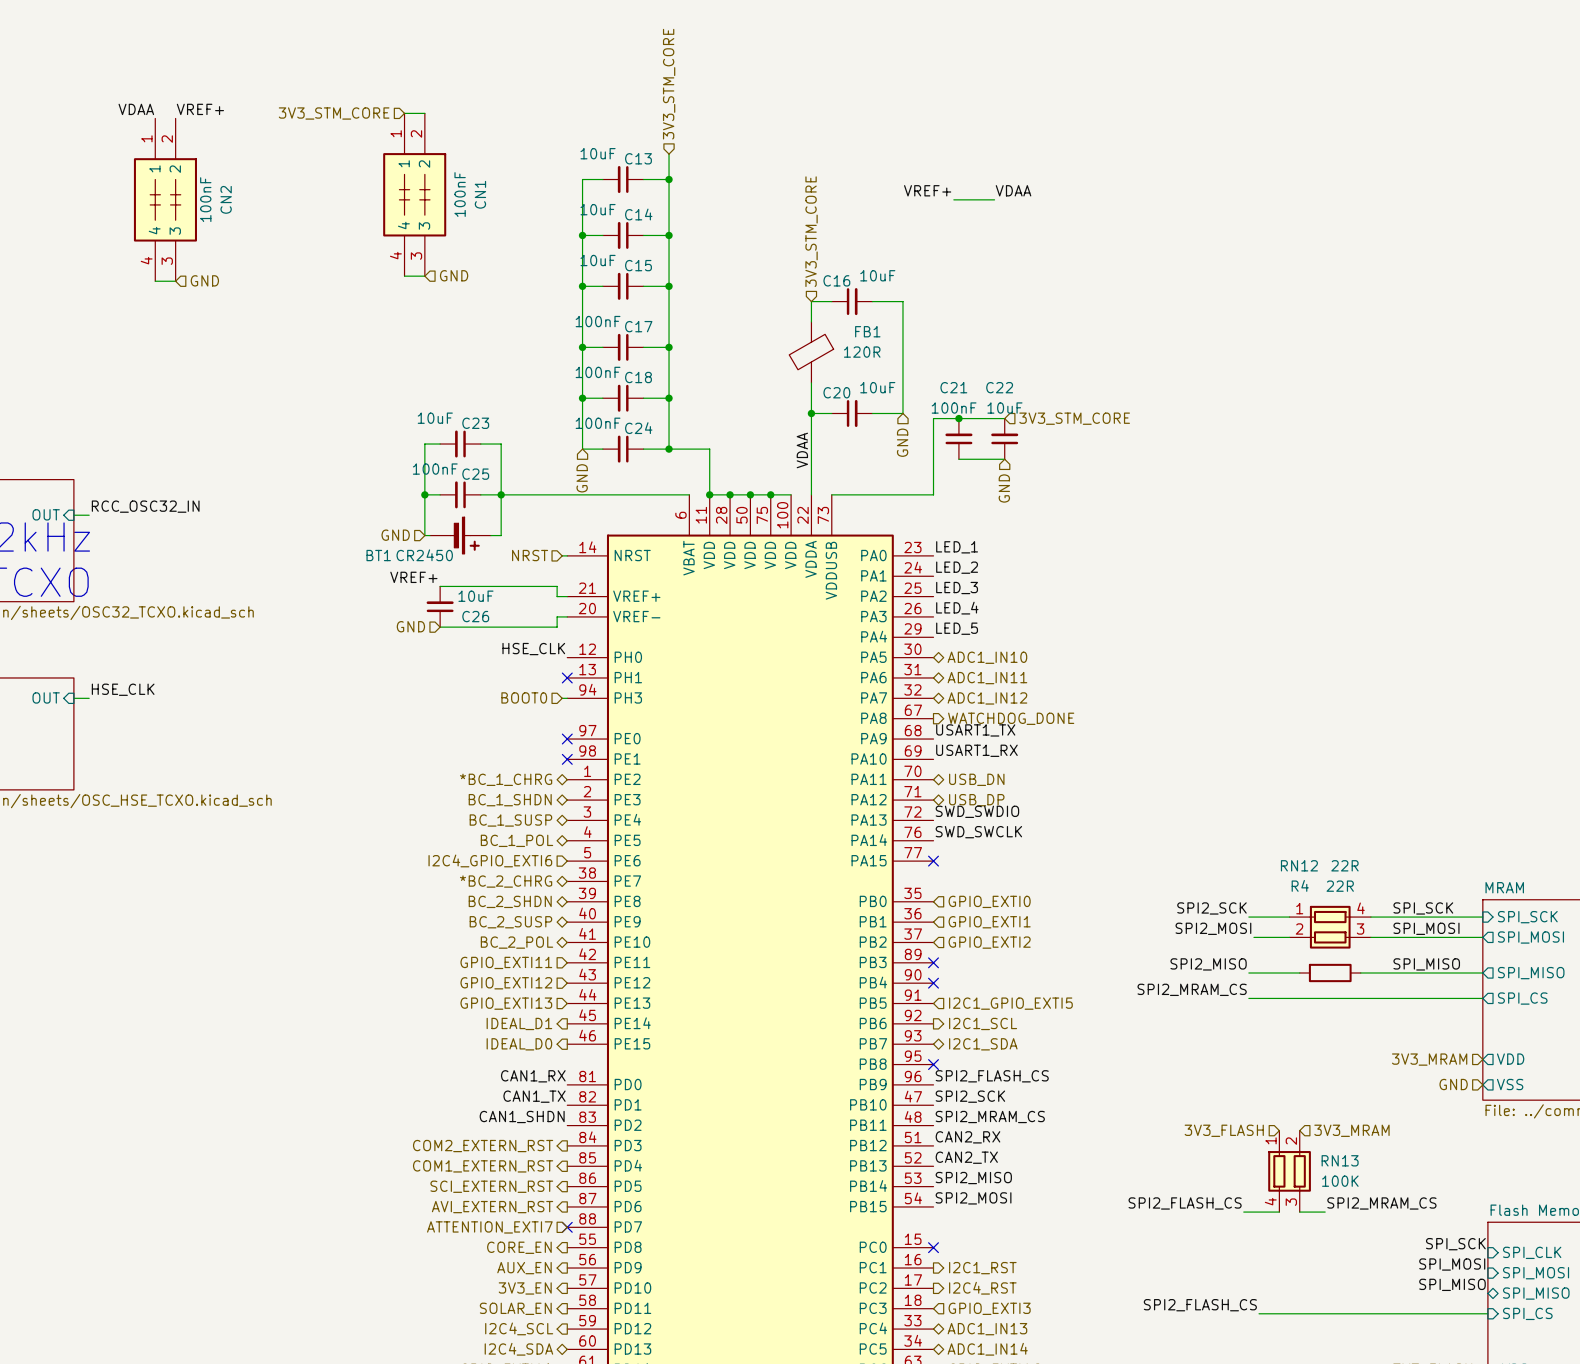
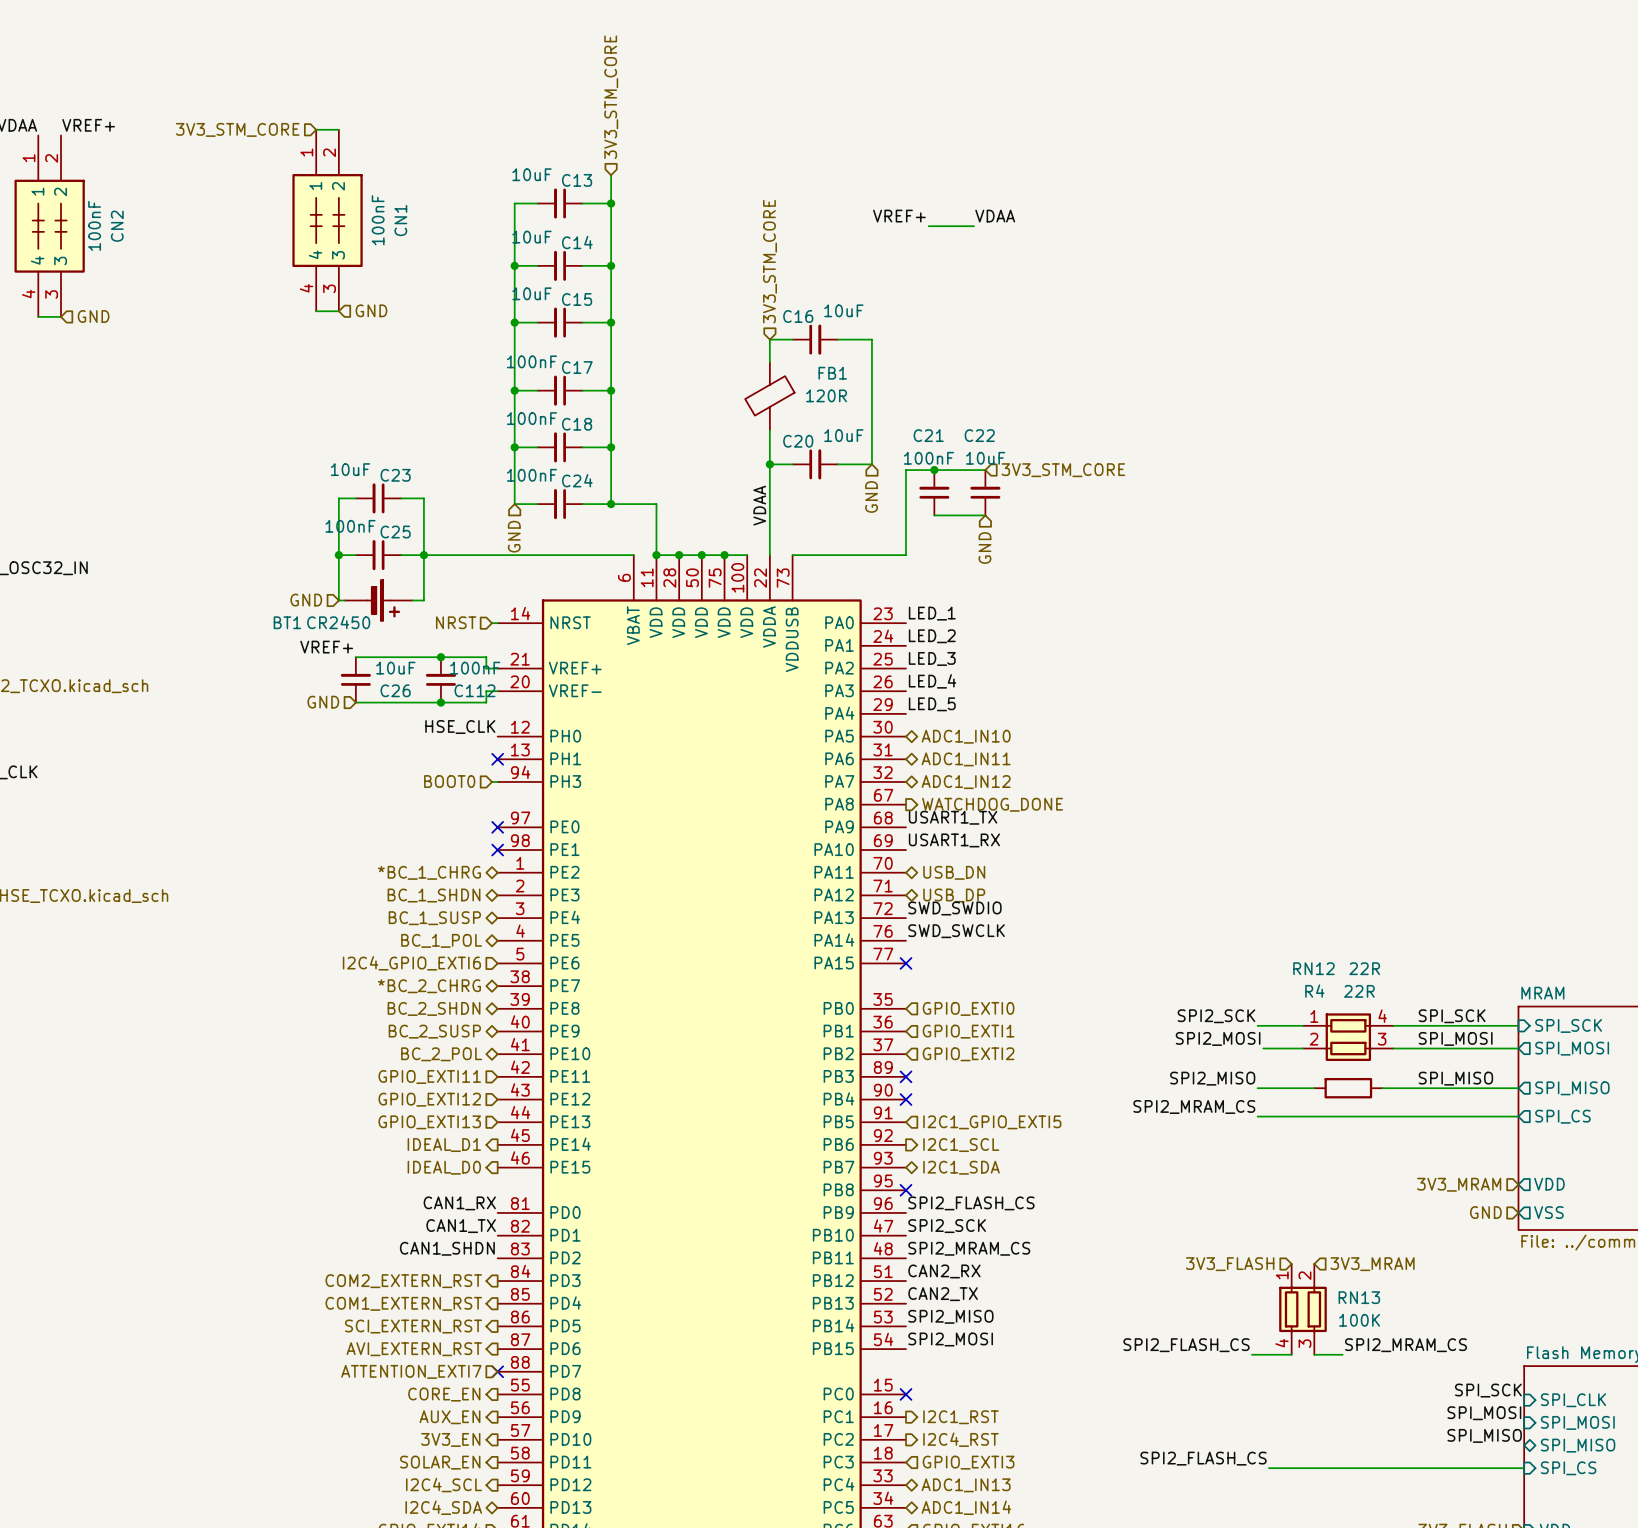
junction: none -> (440, 657)
C112: none -> 100nF (440, 679)
junction: none -> (440, 702)

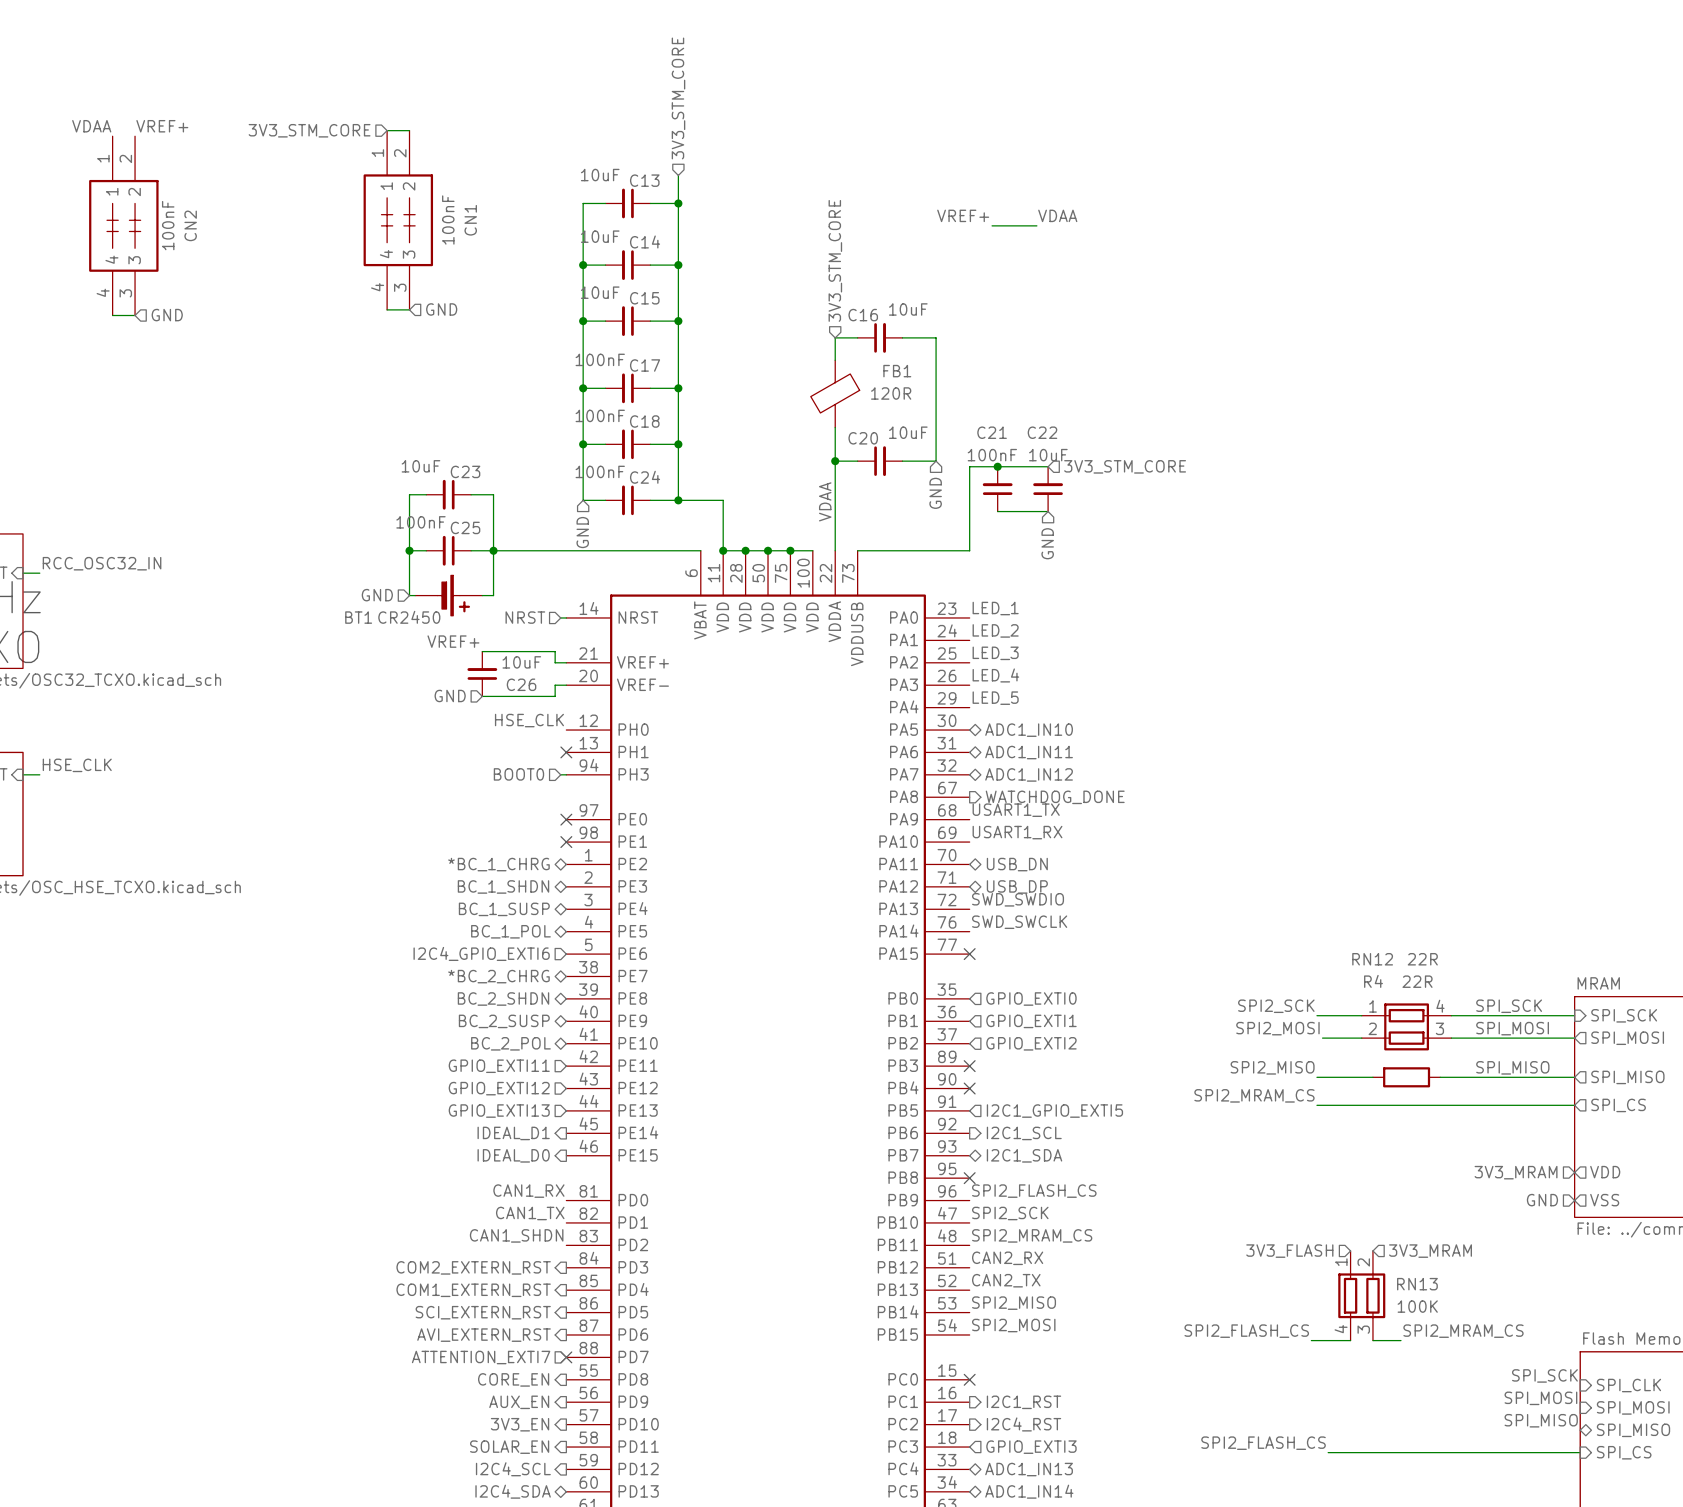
label position: VREF+ (326, 647) -> VREF+ (453, 641)
wire: (355, 657) (412, 657) -> none
junction: (440, 657) -> none
C26 position: (355, 679) -> (482, 674)
C112: 100nF (440, 679) -> none
hierarchical label position: GND (323, 702) -> GND (450, 695)
wire: (355, 702) (412, 702) -> none
junction: (440, 702) -> none

